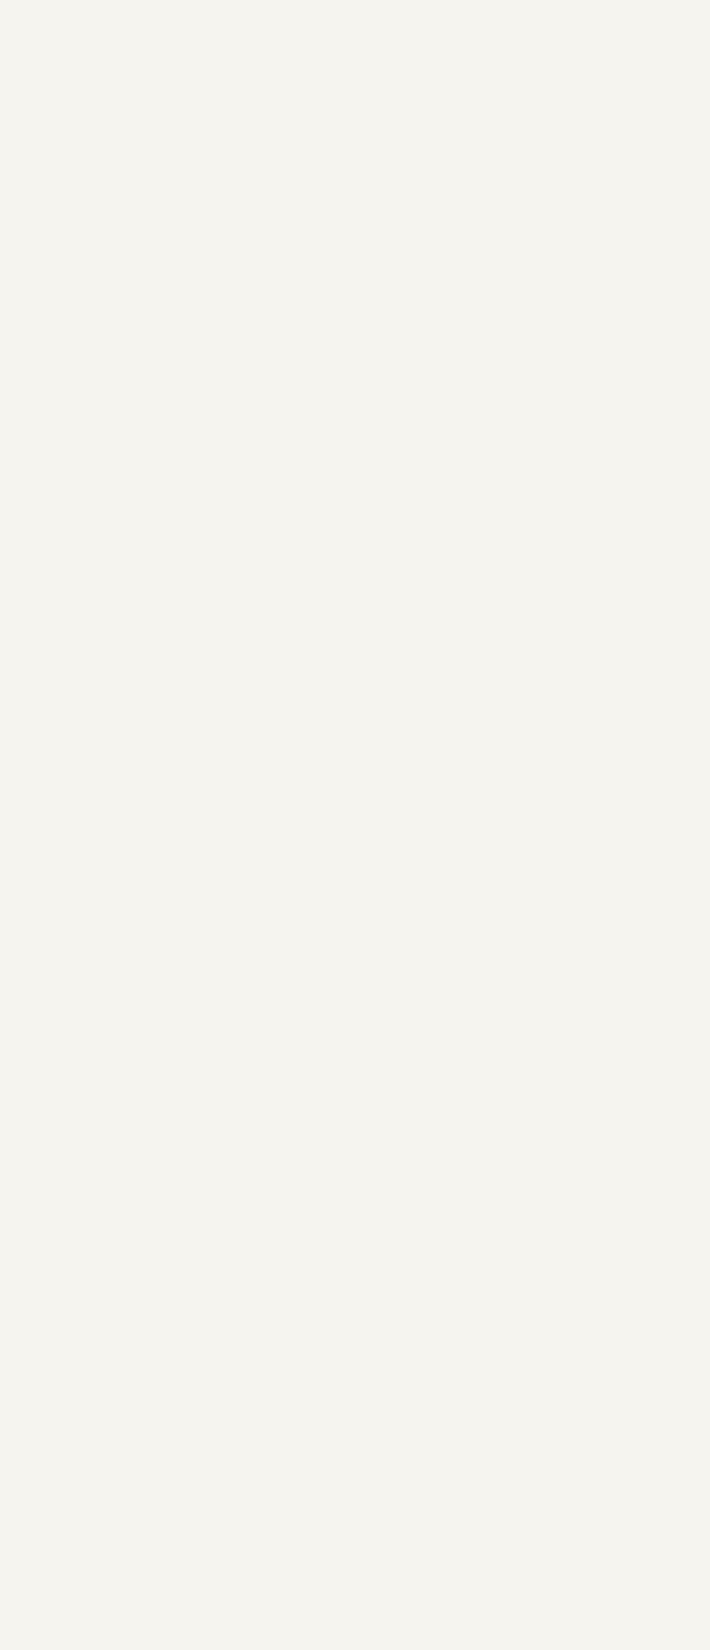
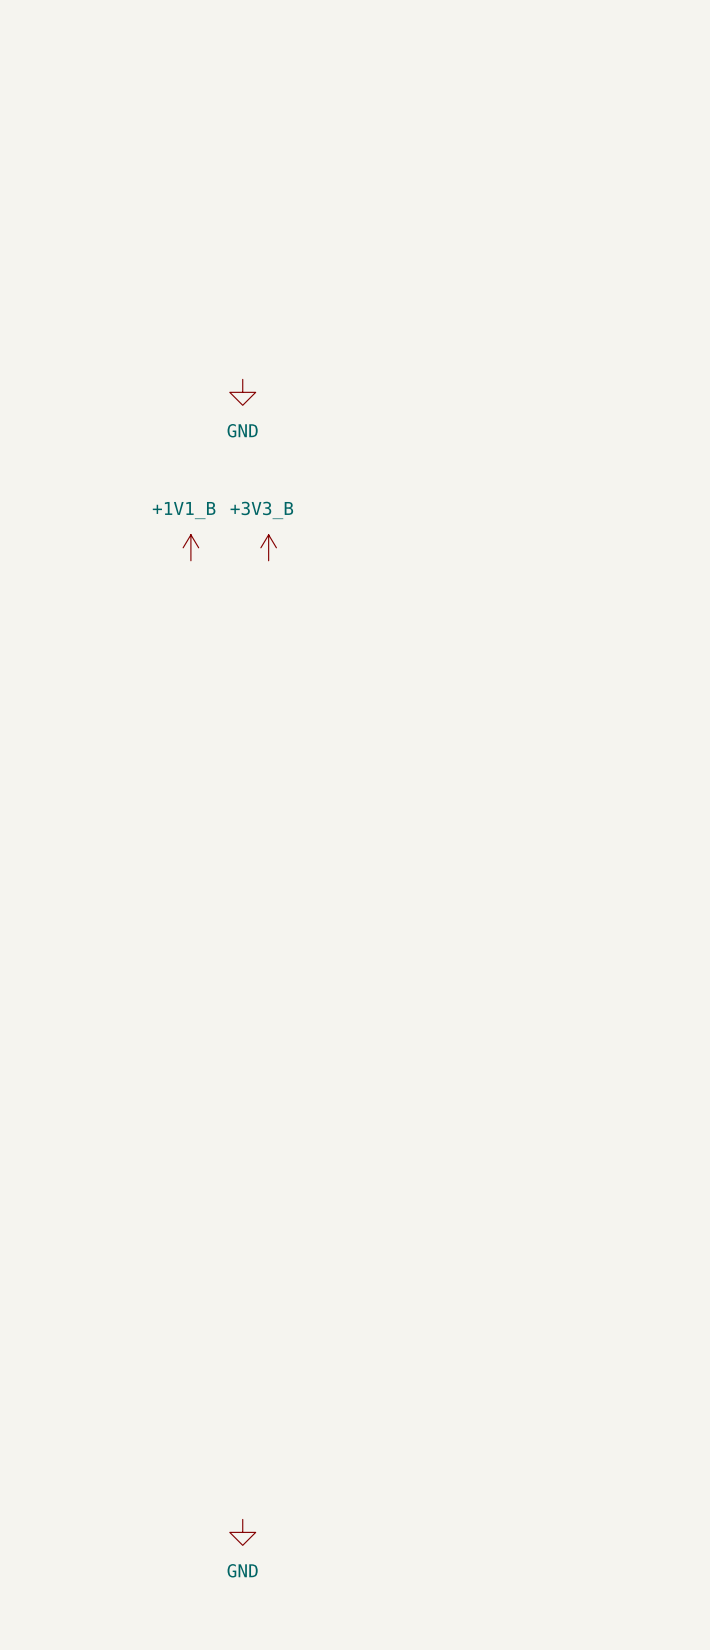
power symbol: none -> GND (242, 392)
power symbol: none -> +1V1_B (190, 547)
power symbol: none -> +3V3_B (268, 547)
power symbol: none -> GND (242, 1532)

